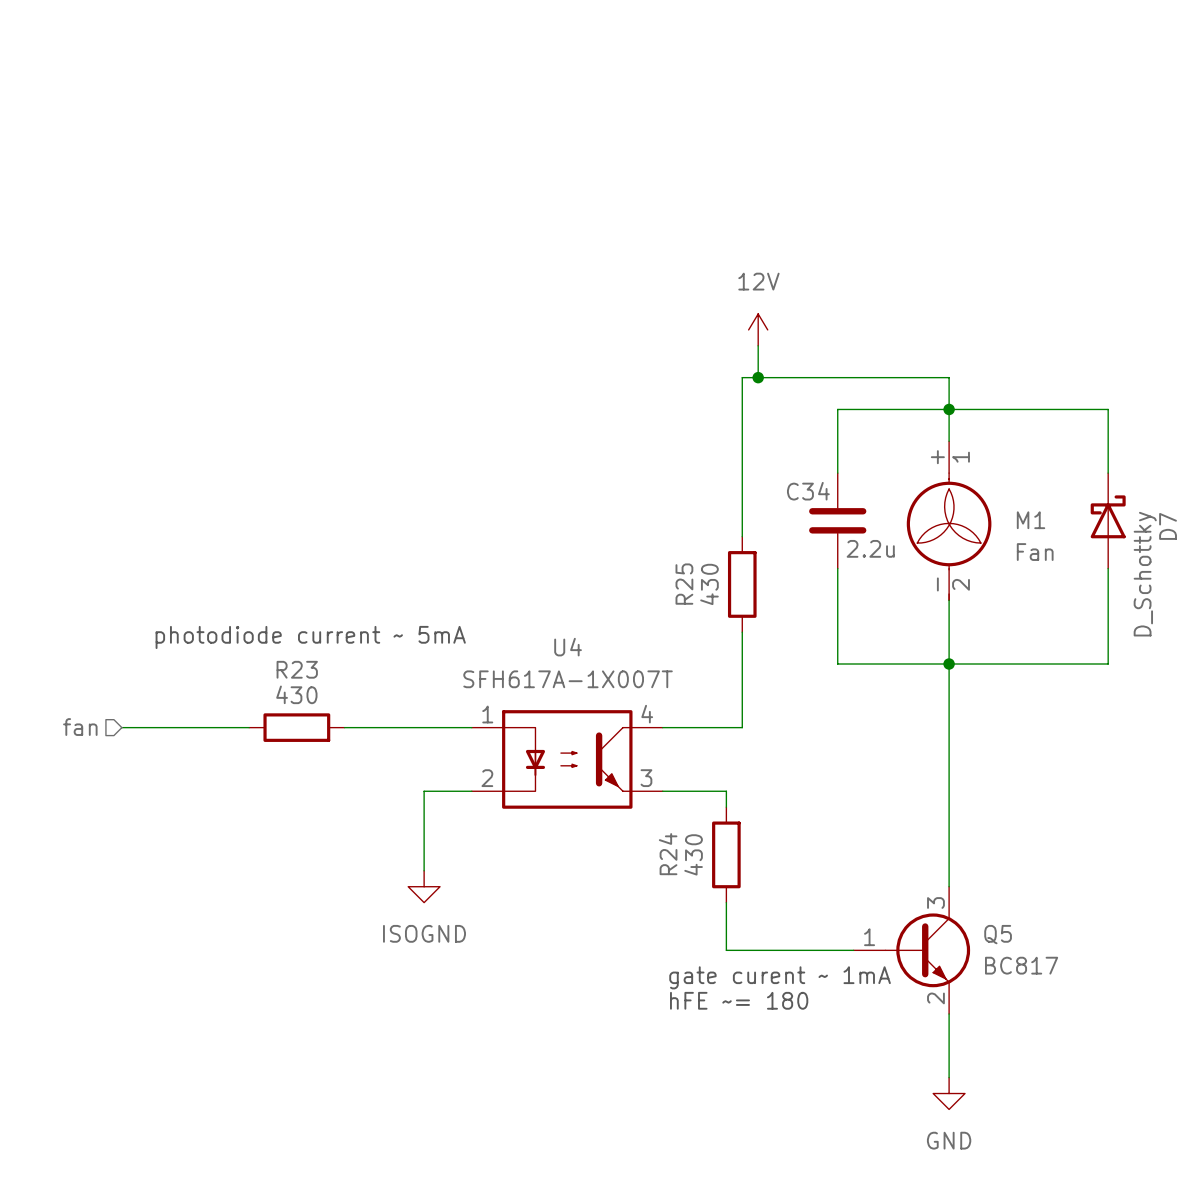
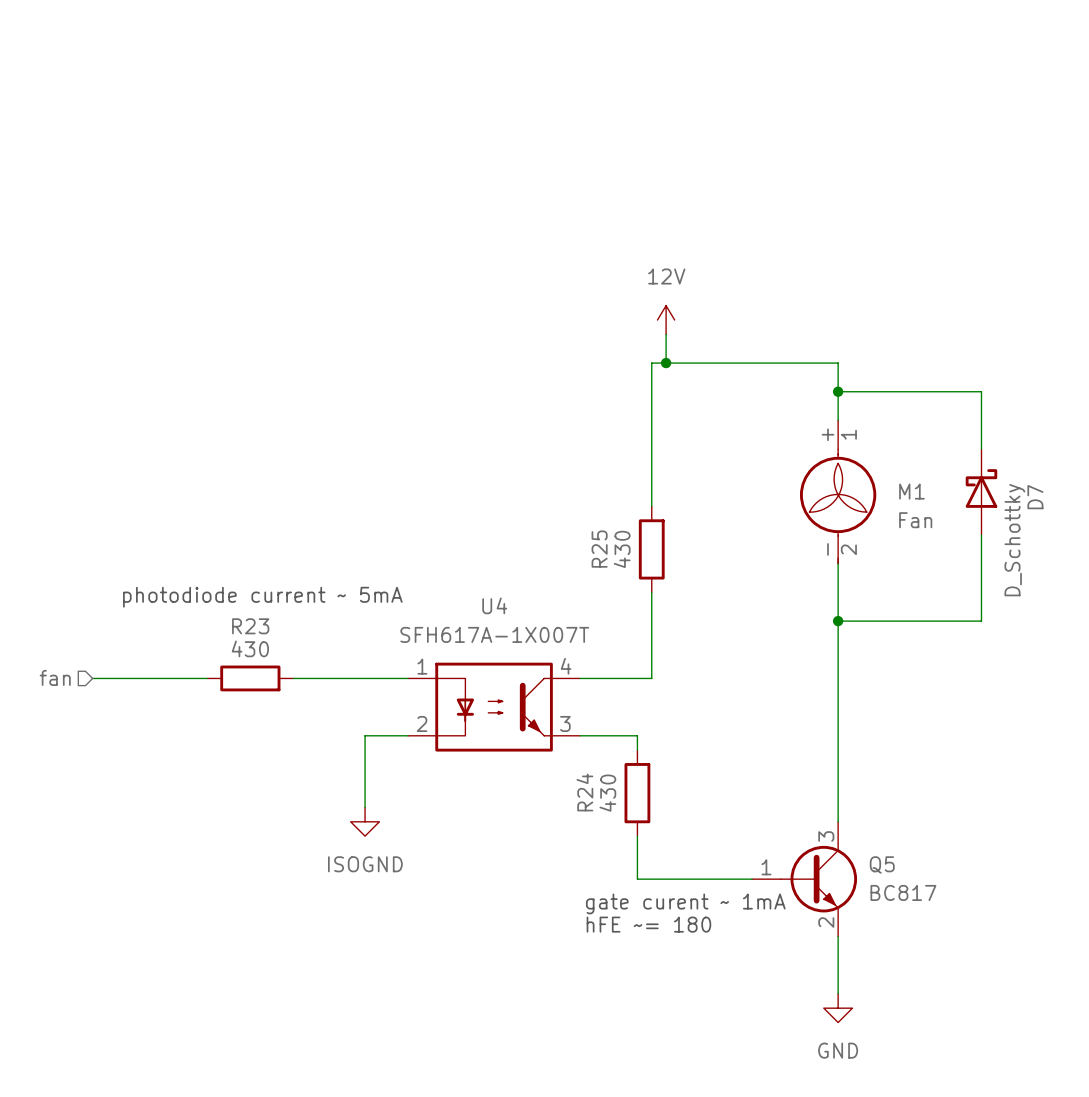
wire: (949, 409) (837, 409) (837, 473) -> none
C34: 2.2u (837, 520) -> none
wire: (837, 568) (837, 663) (949, 663) -> none

